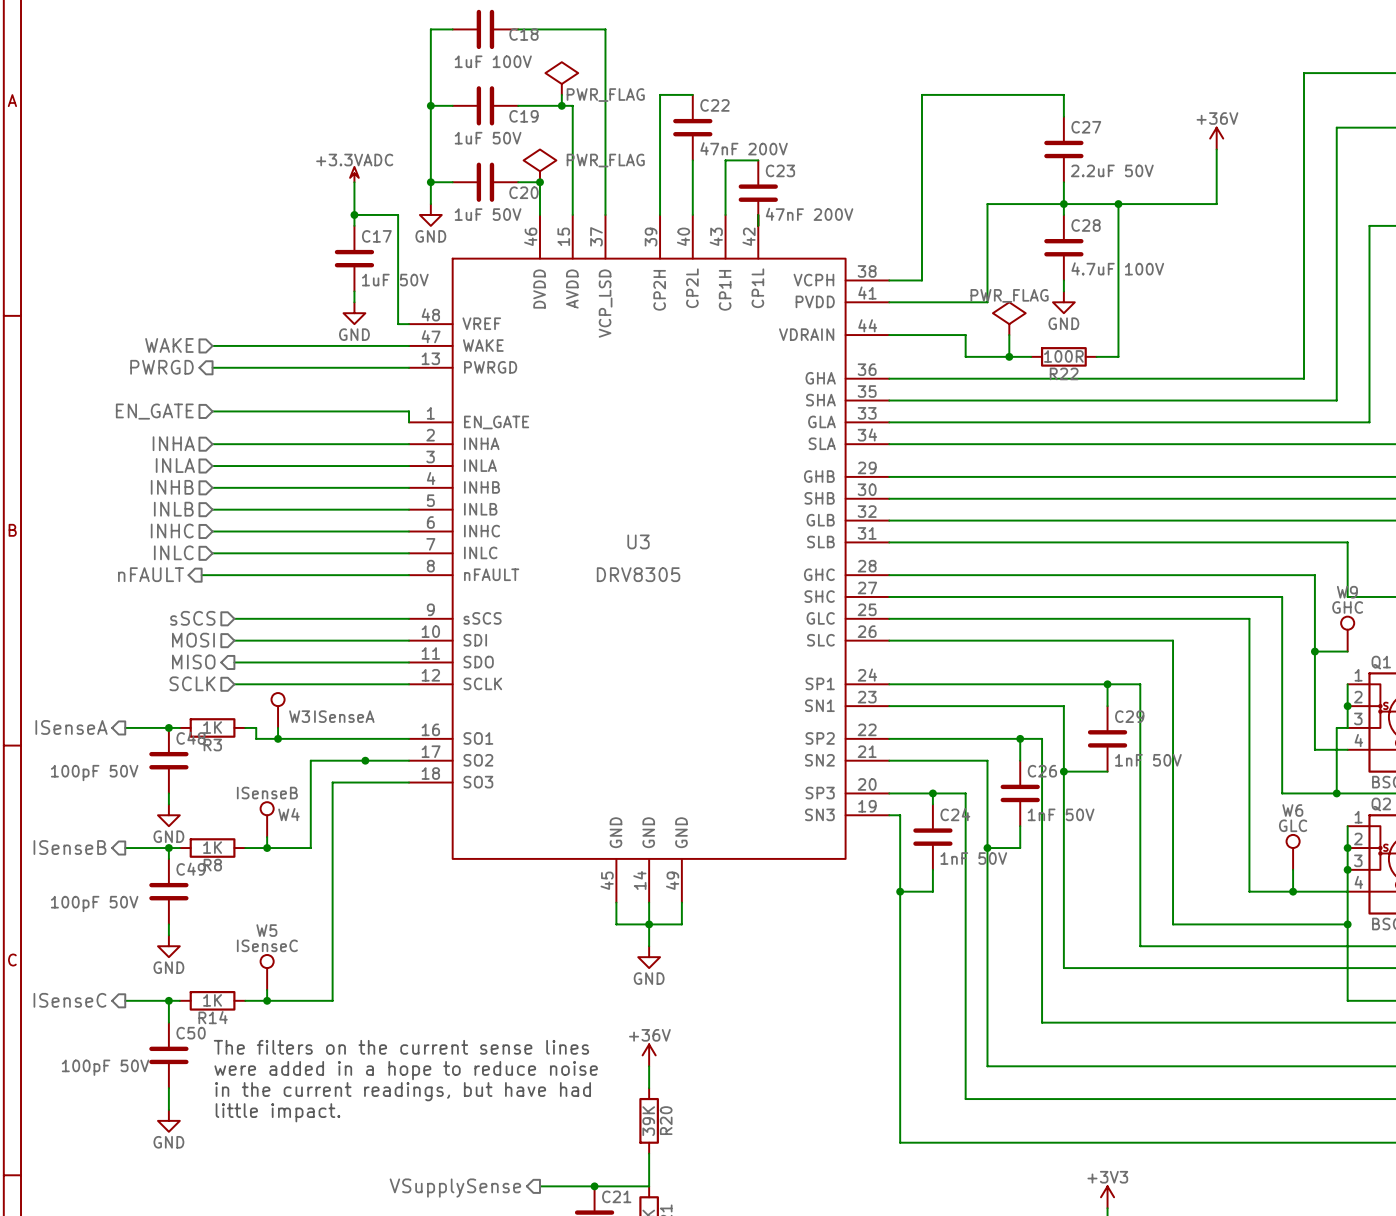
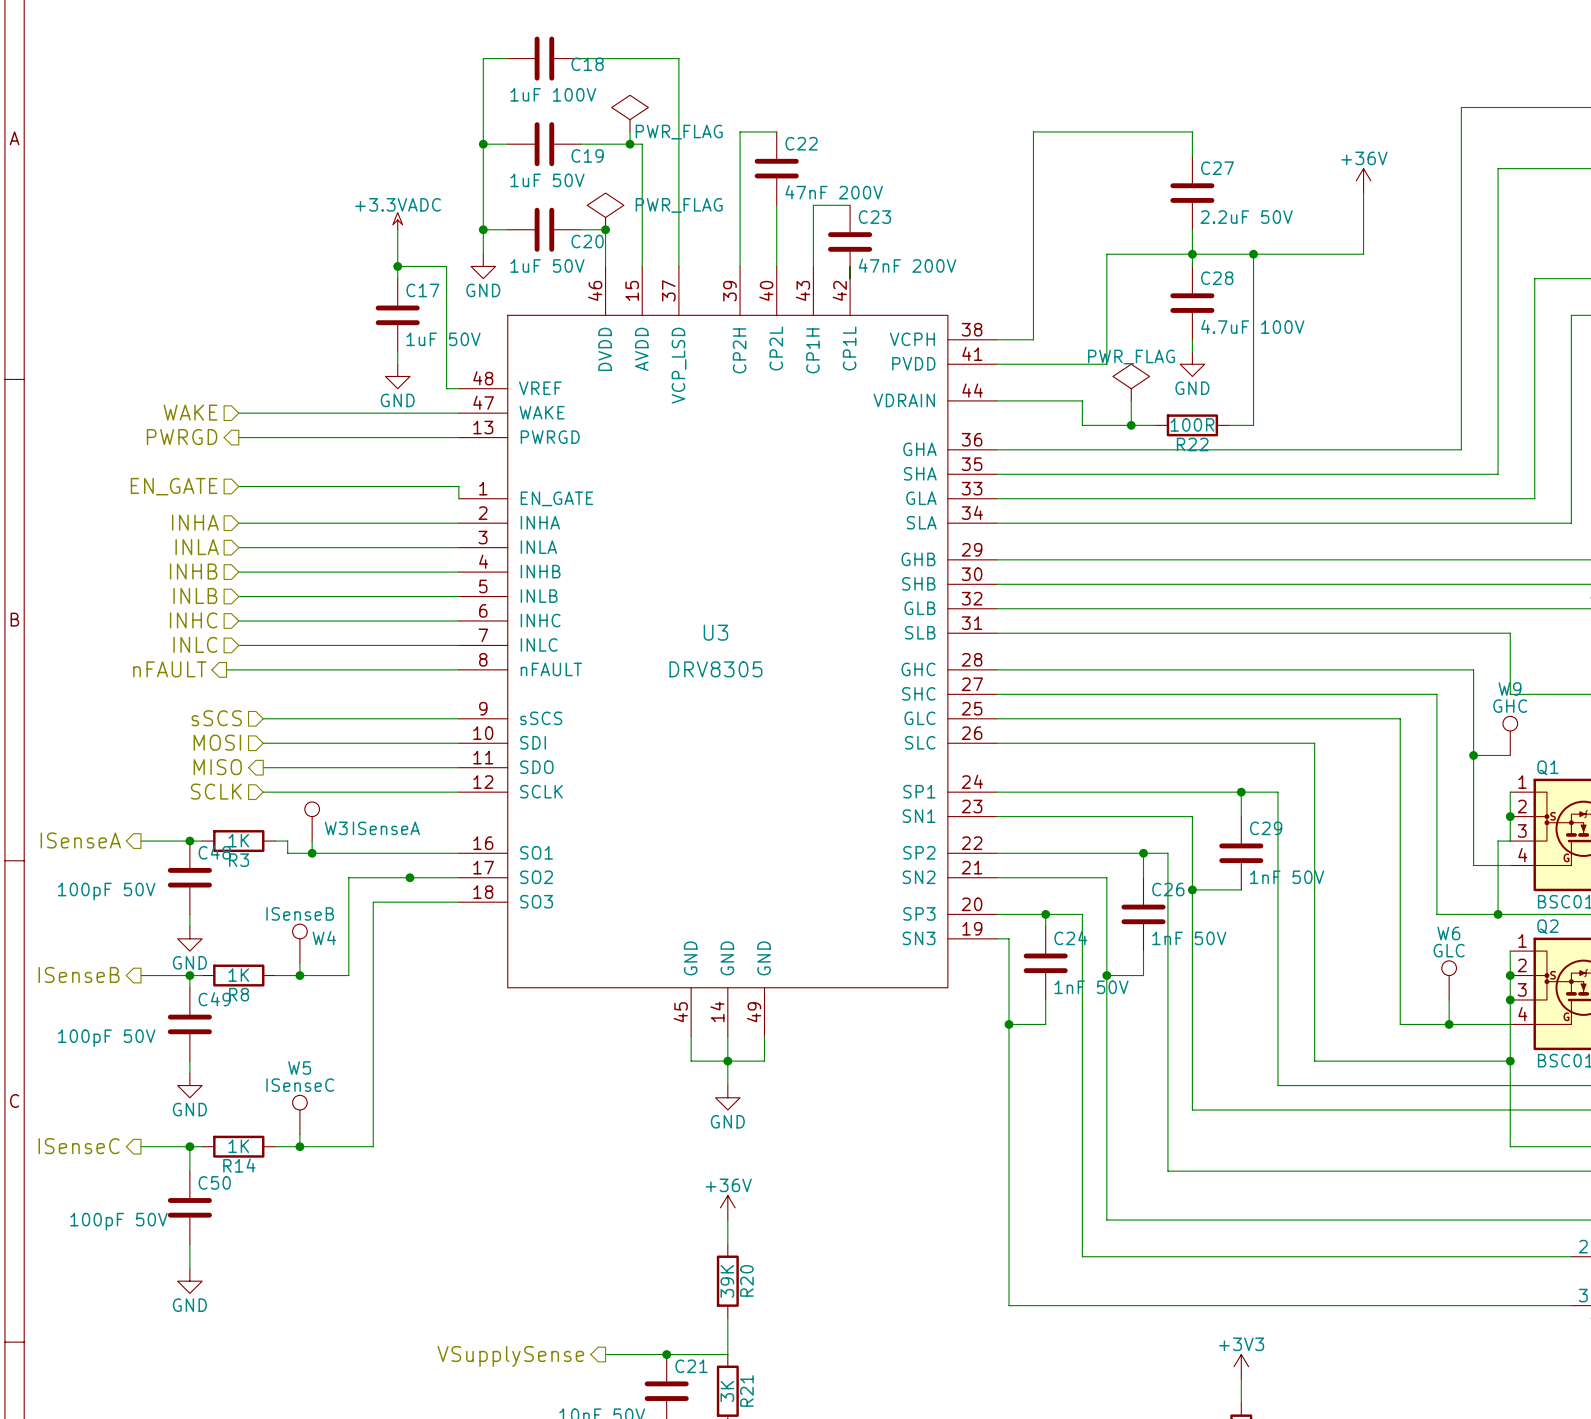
text: The filters on the current sense lines (401, 1047) -> none
text: were added in a hope to reduce noise (406, 1070) -> none
text: in the current readings, but have had (403, 1091) -> none
text: little impact. (277, 1112) -> none

